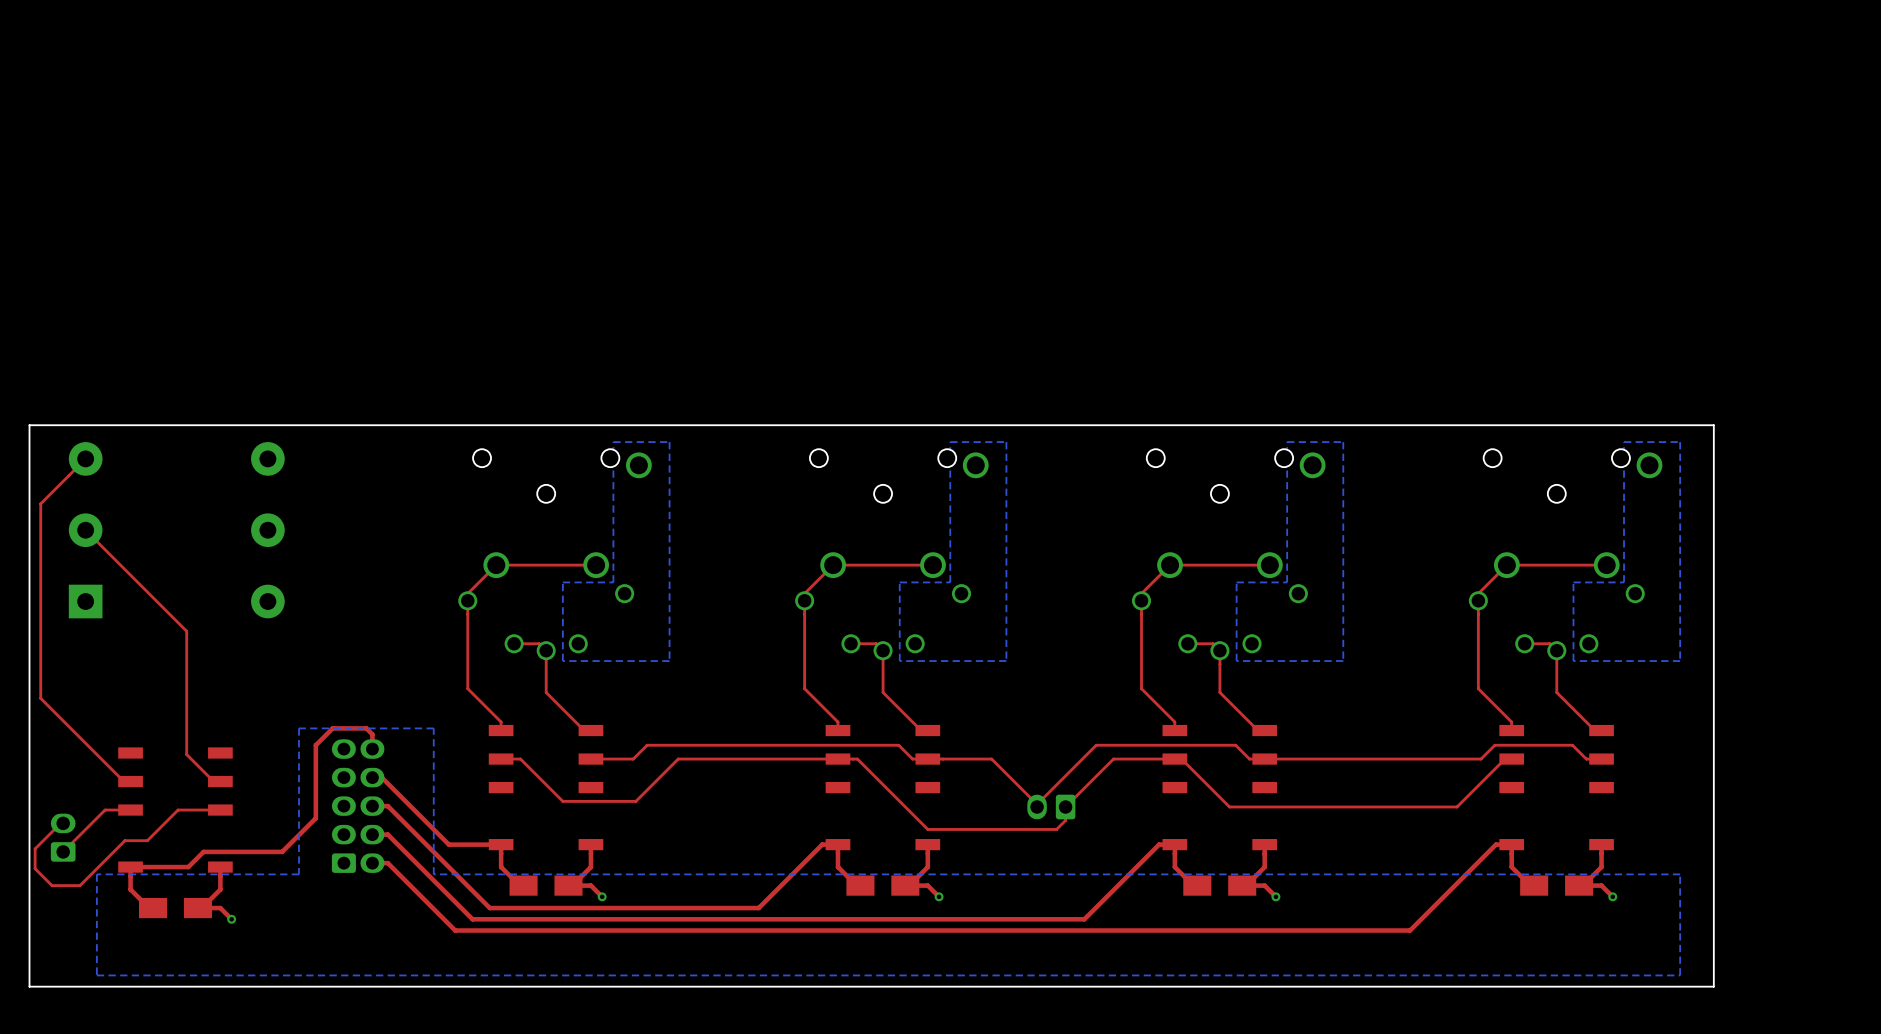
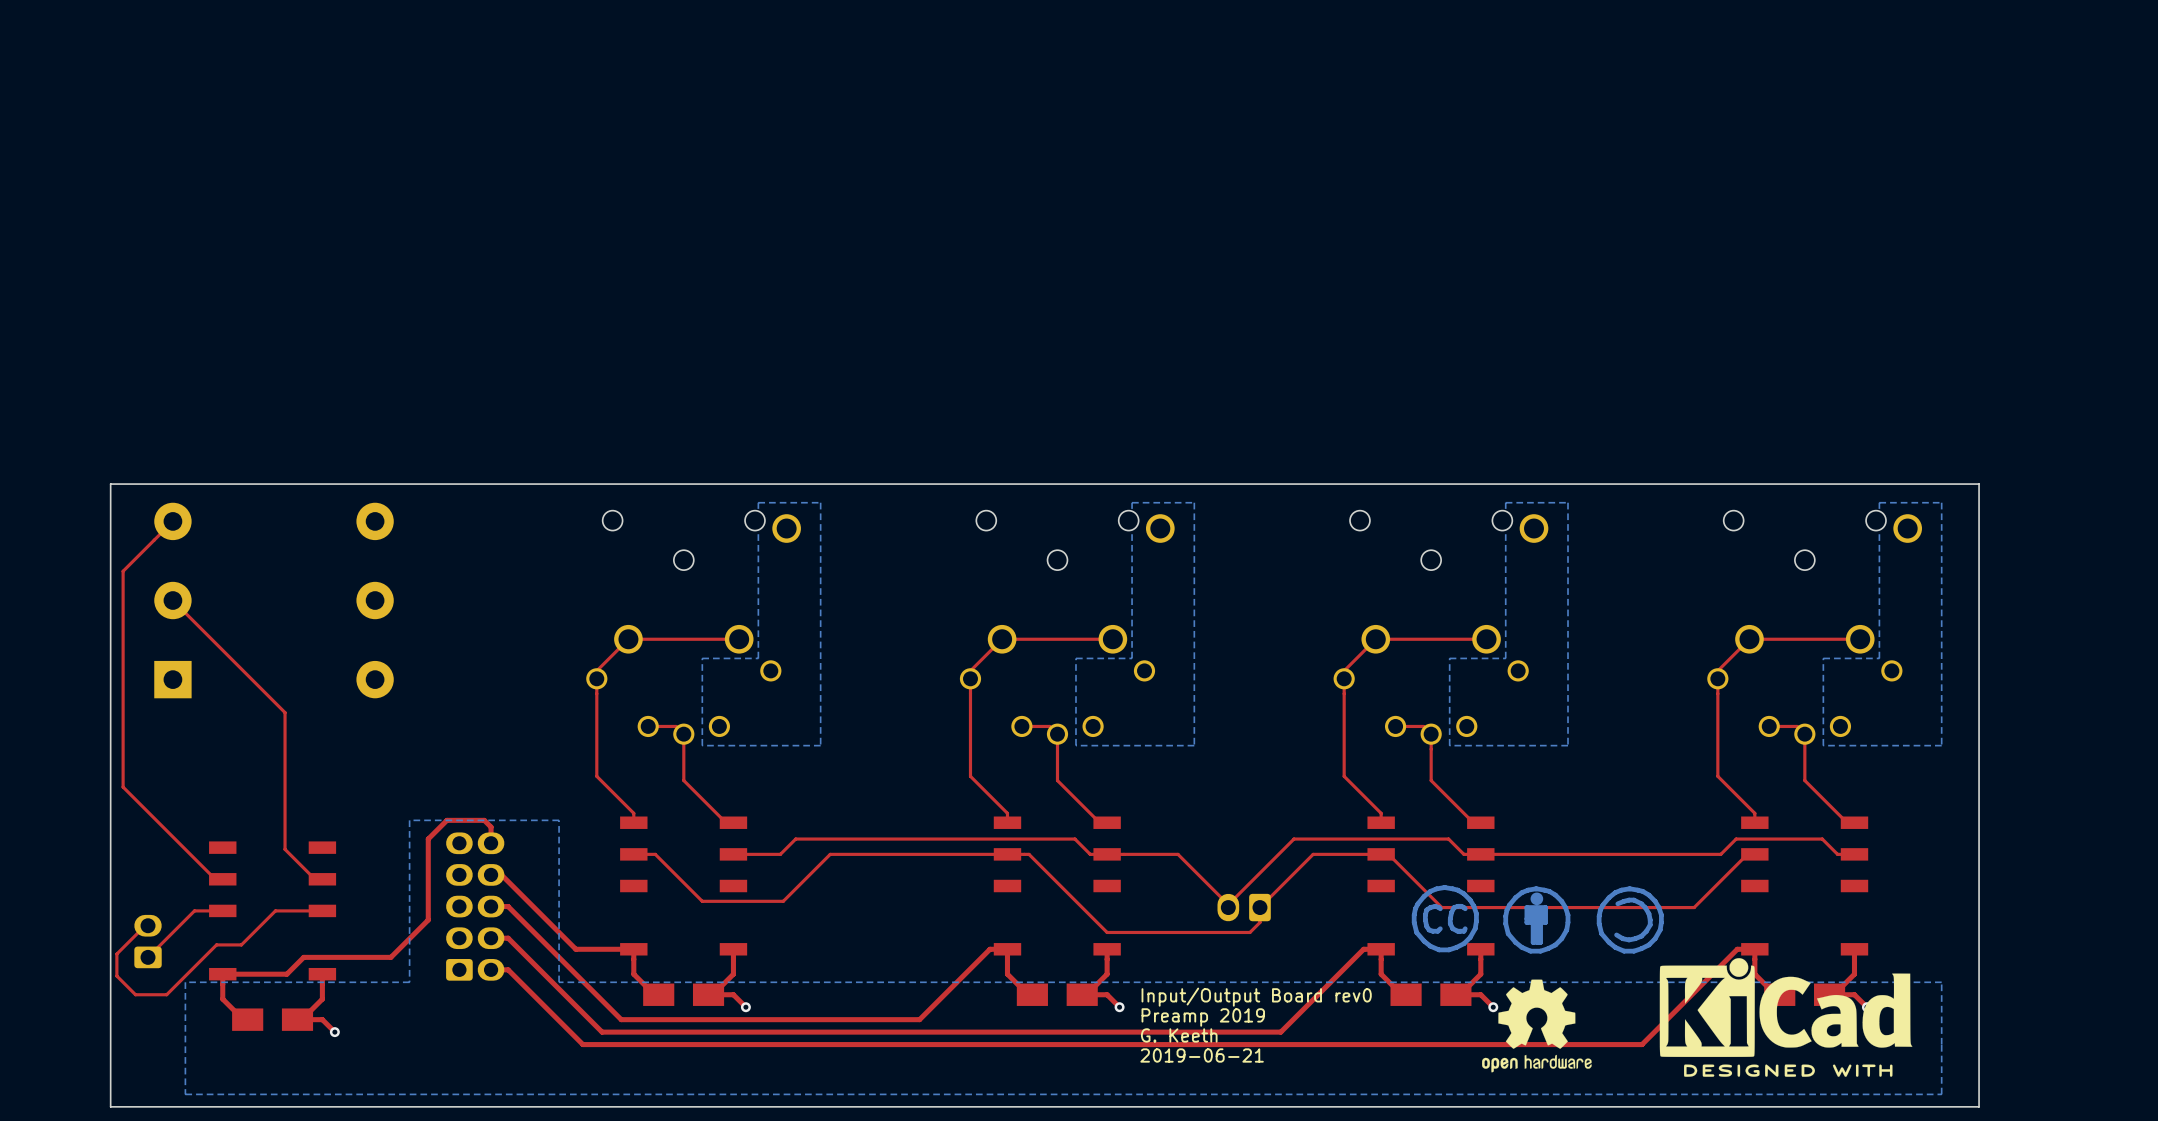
drawing: none -> [1411, 885, 1479, 953]
drawing: none -> [1503, 886, 1571, 954]
drawing: none -> [1596, 886, 1913, 1077]
drawing: none -> [1482, 979, 1592, 1073]
text: none -> Input/Output Board rev0 (1256, 997)
text: none -> Preamp 2019 (1203, 1017)
text: none -> G. Keeth (1179, 1035)
text: none -> 2019-06-21 (1202, 1055)

